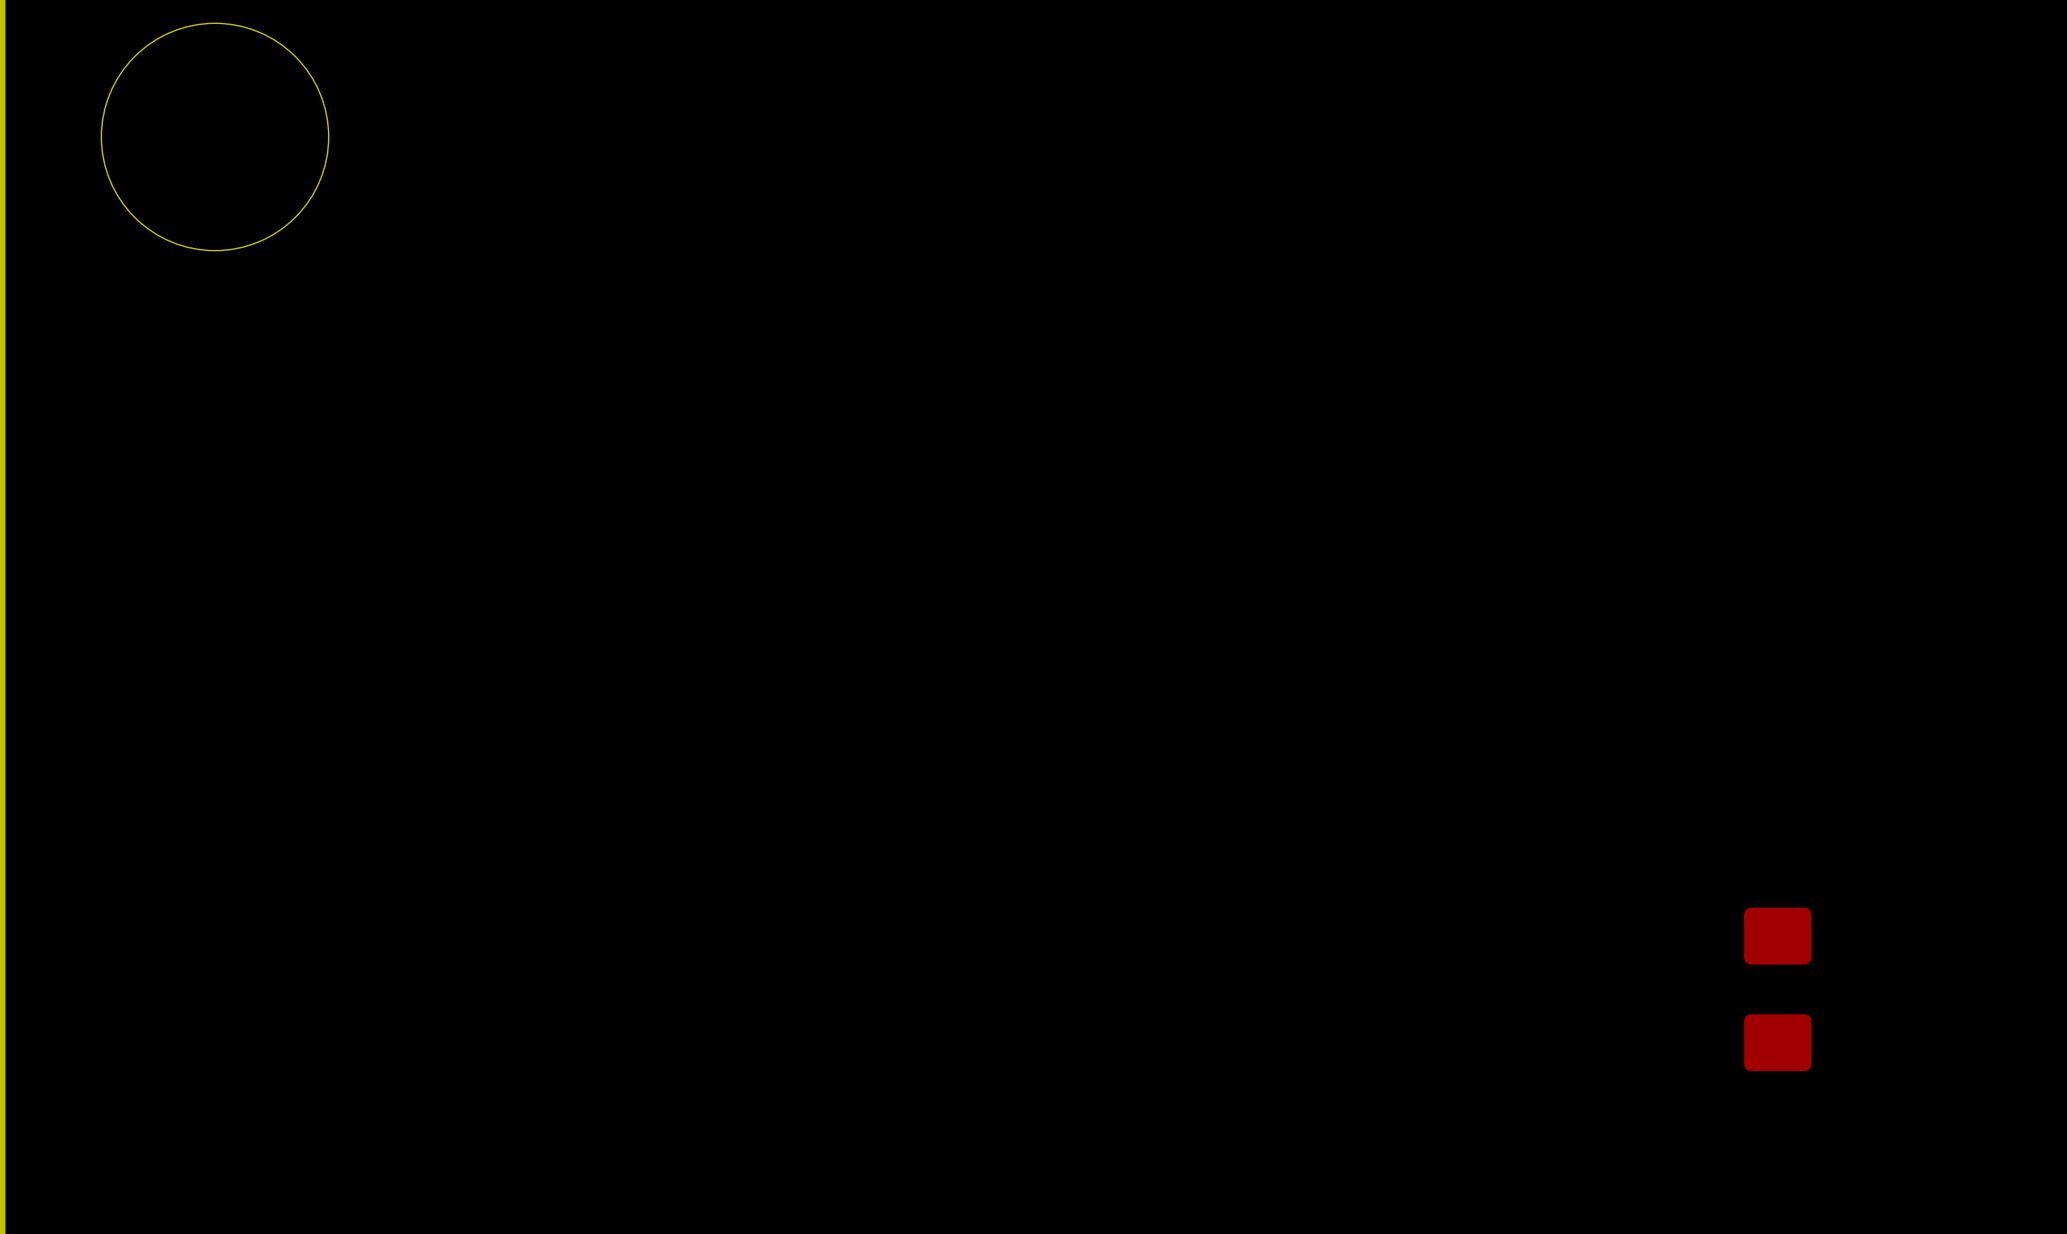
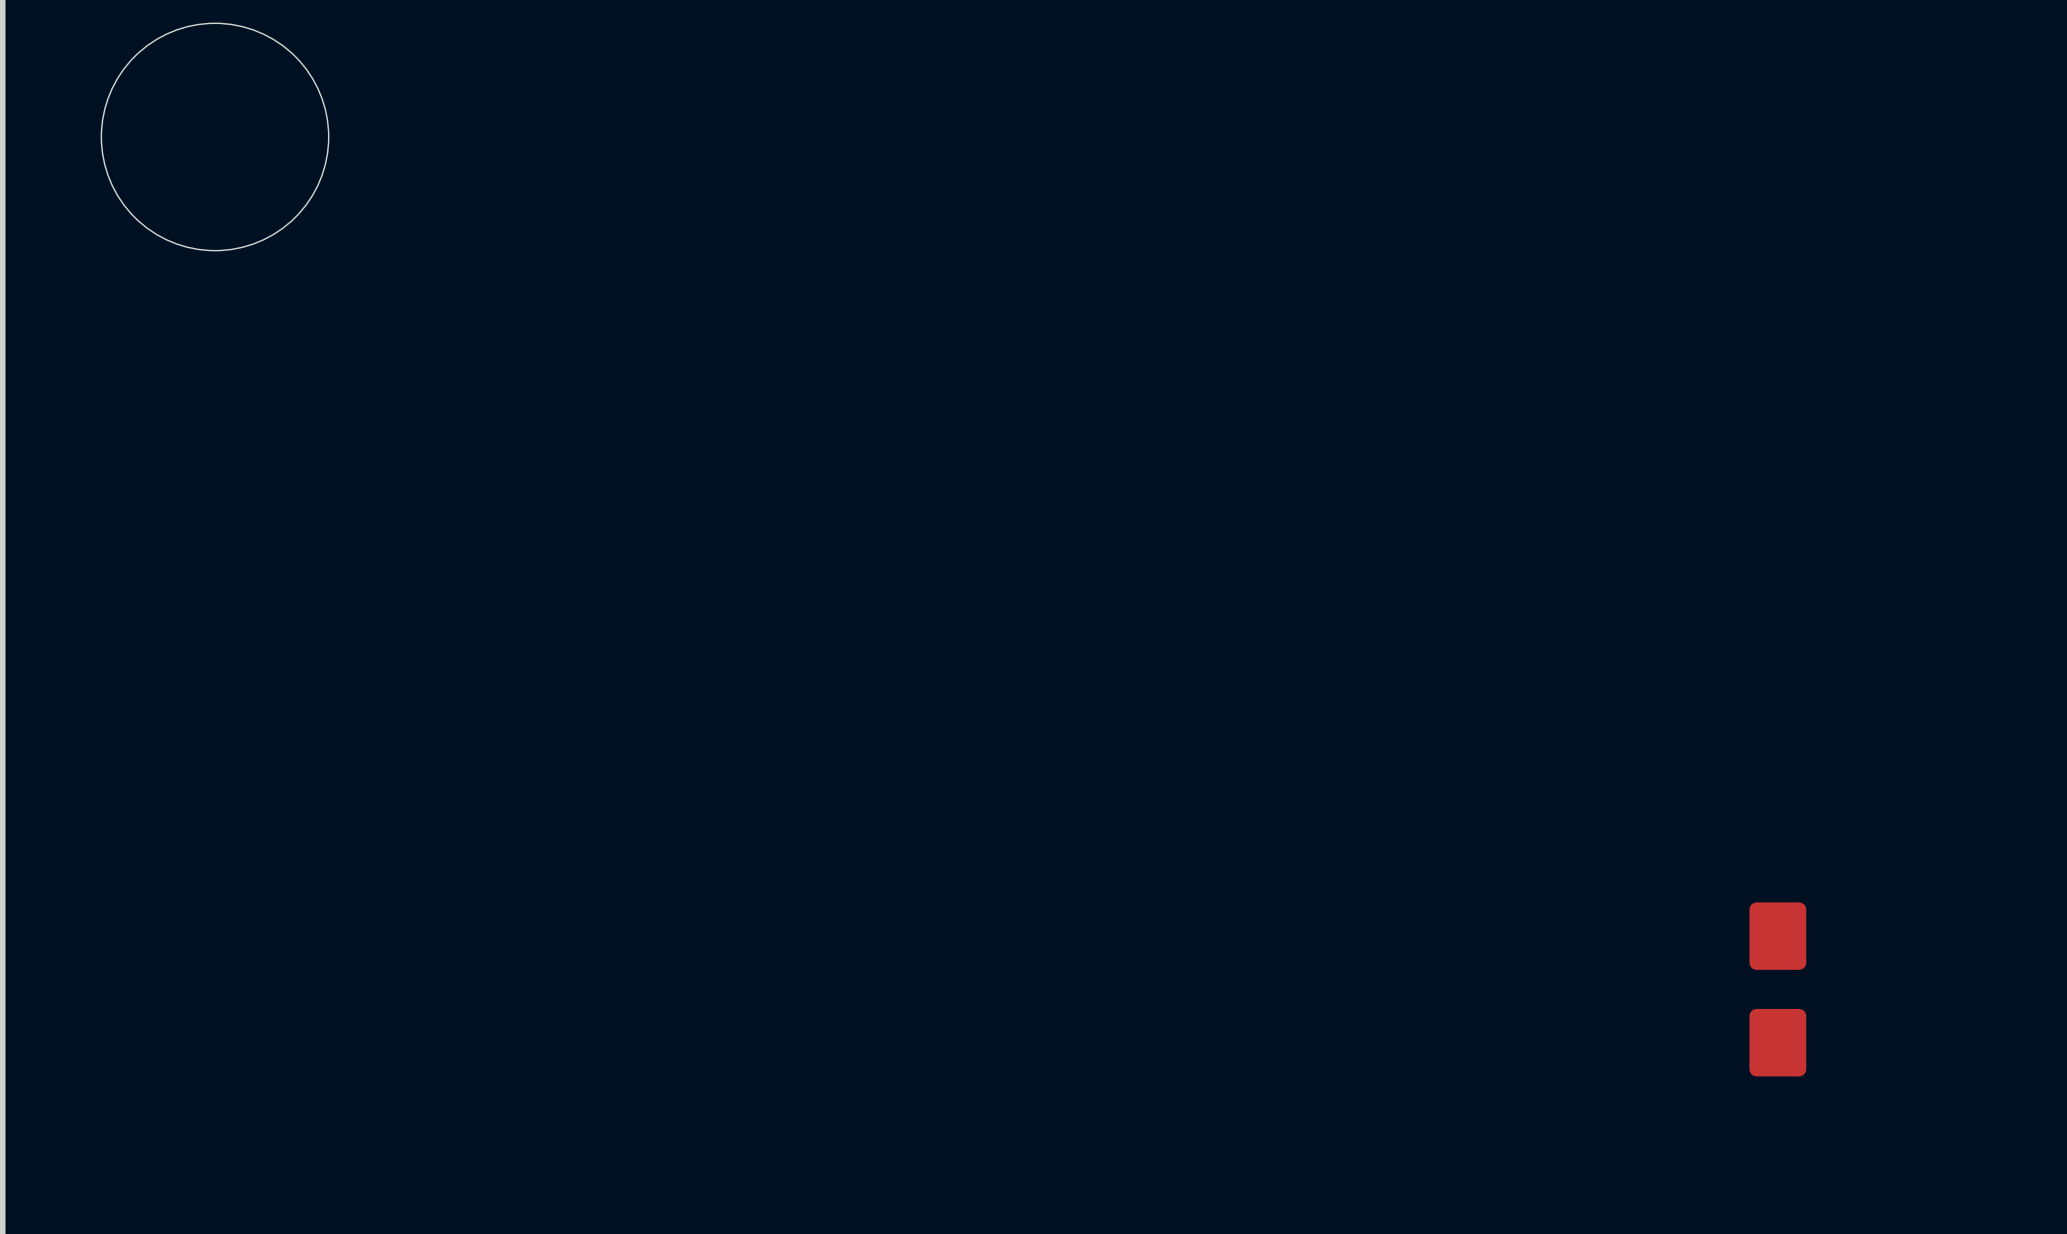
part footprint: [1744, 907, 1812, 1072] -> [1749, 902, 1807, 1077]

